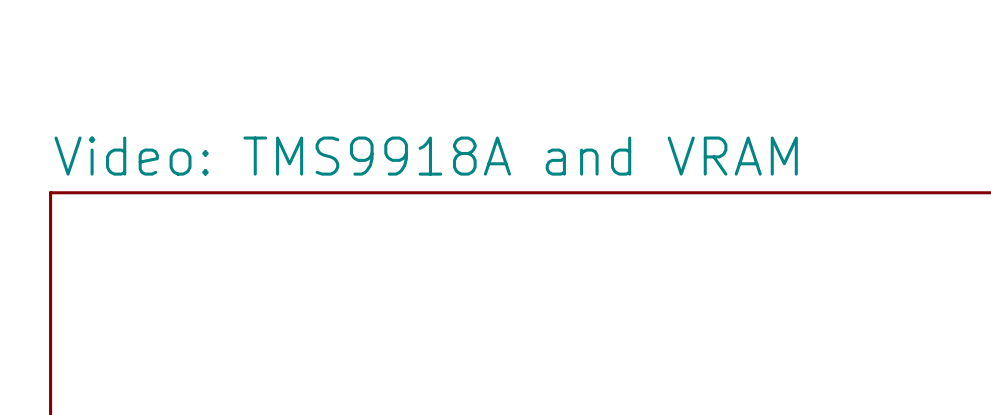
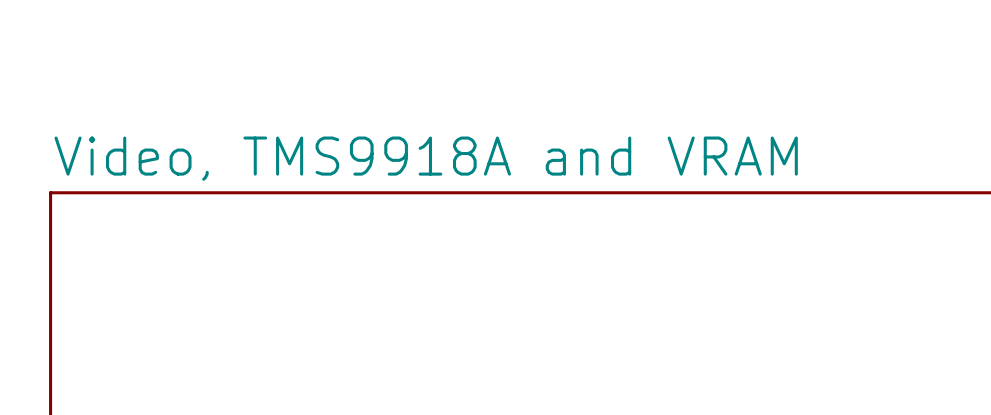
sheet Video, TMS9918A and VRAM name: Video: TMS9918A and VRAM (426, 156) -> Video, TMS9918A and VRAM (426, 158)

